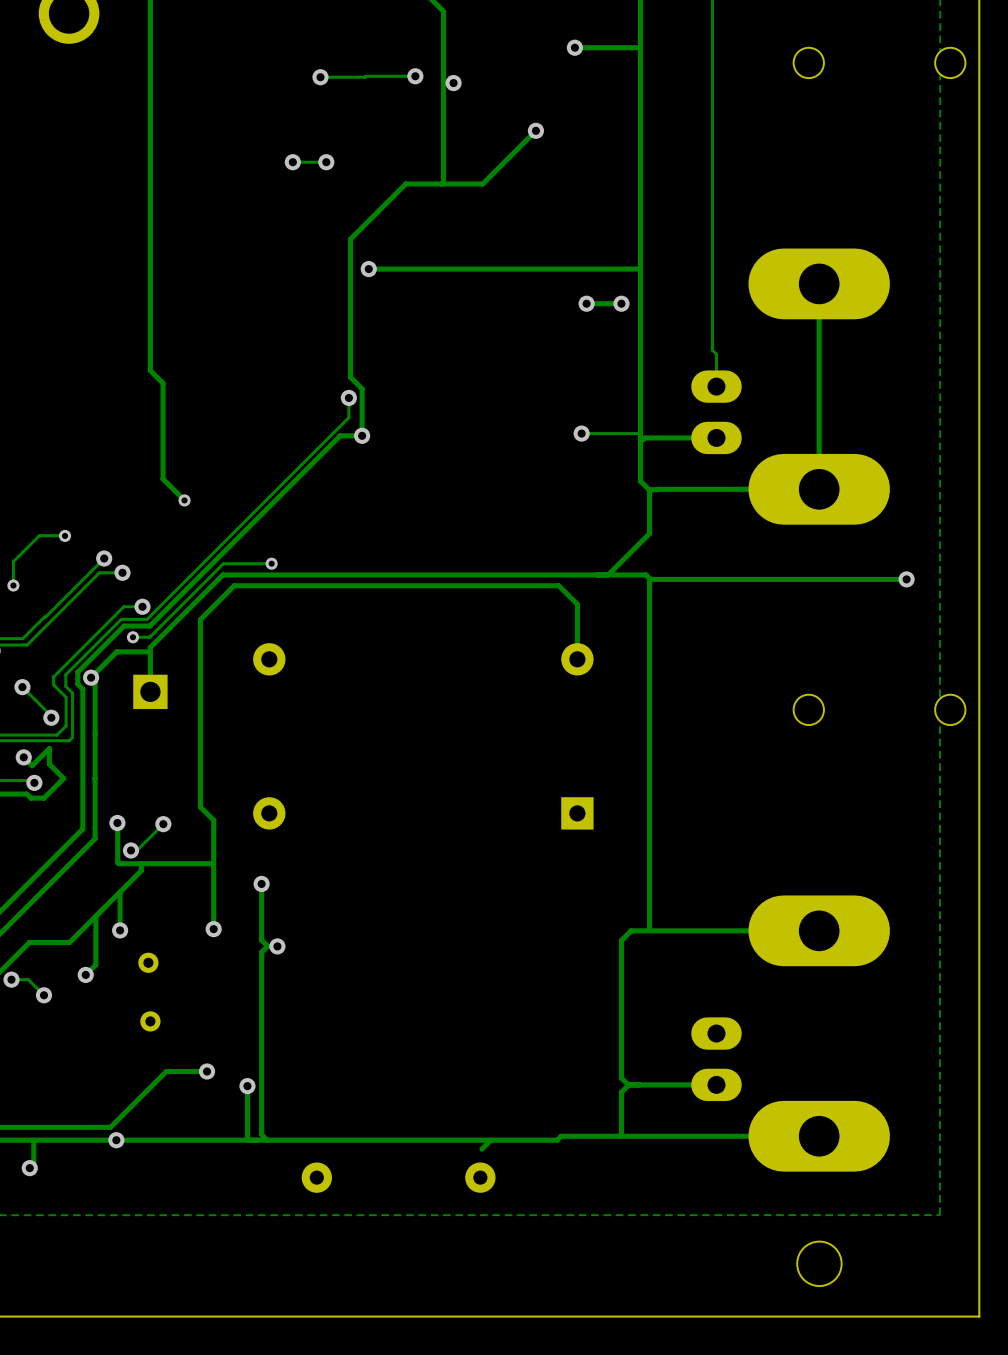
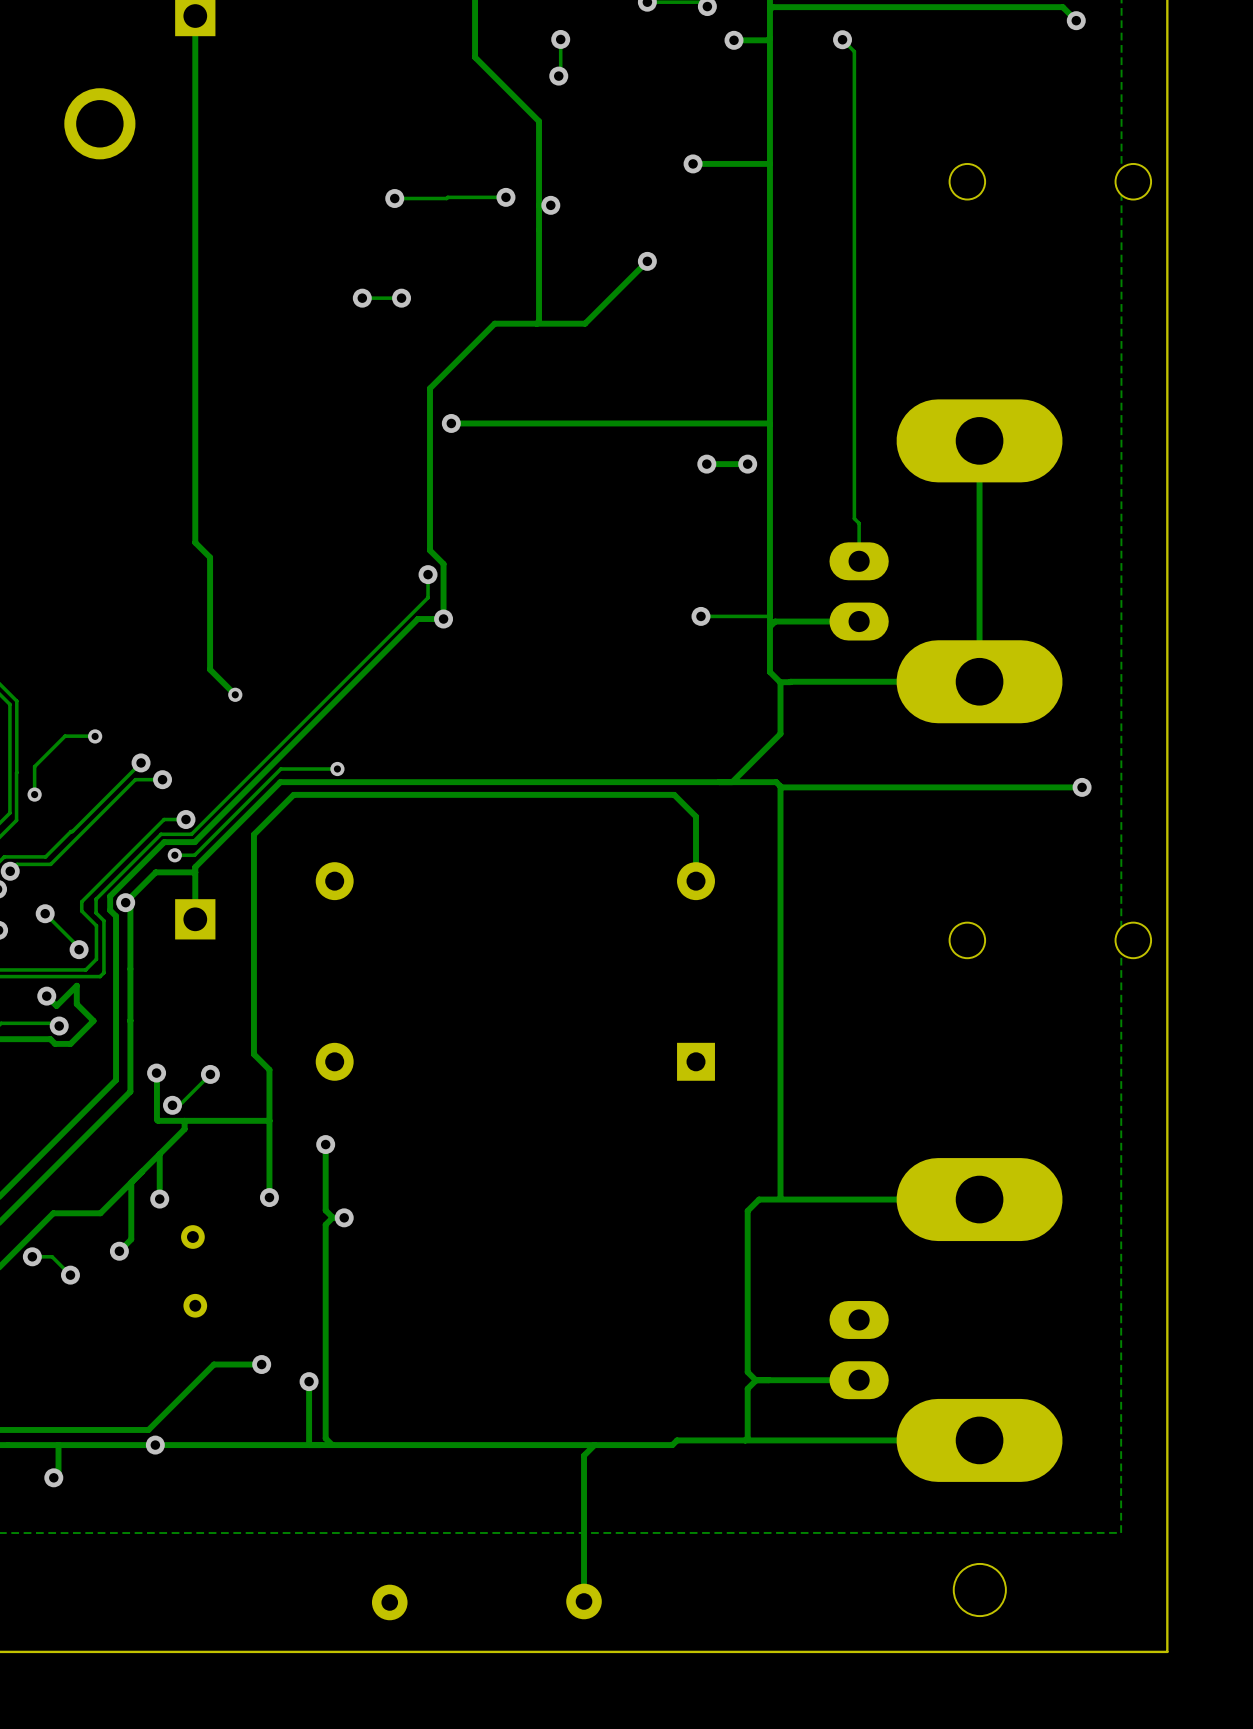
track: none -> (584, 1455) (584, 1601)
part: (316, 1177) -> none
part: (480, 1177) -> none
part: none -> (584, 1601)
part: none -> (389, 1602)

